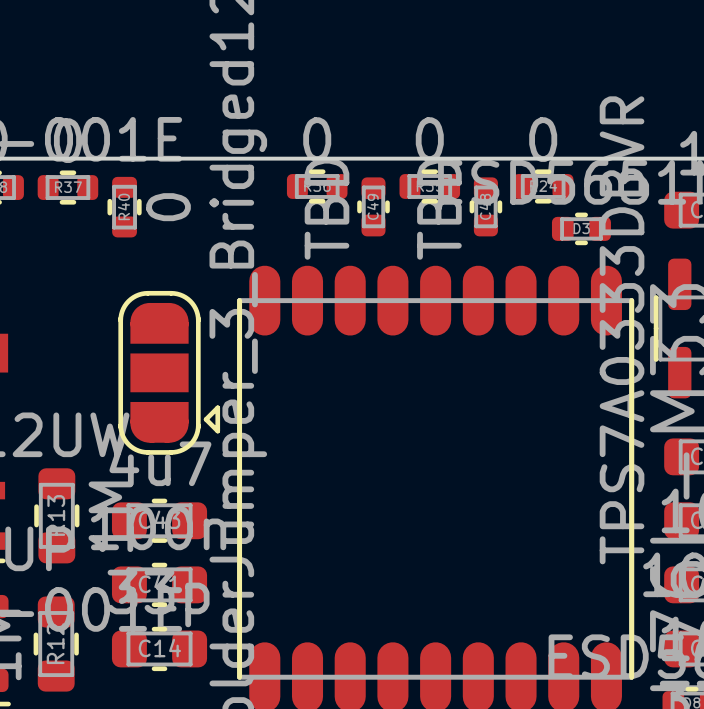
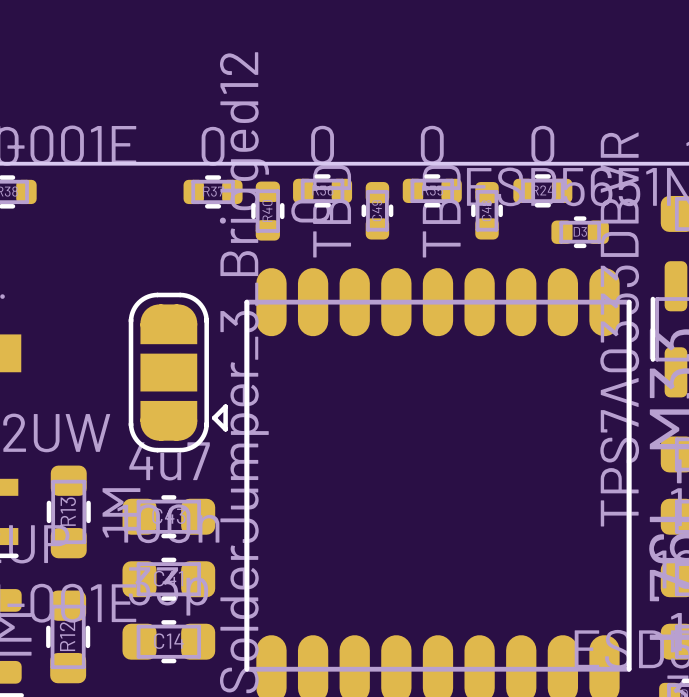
R37 position: (67, 187) -> (213, 191)
R40 position: (124, 207) -> (267, 211)

